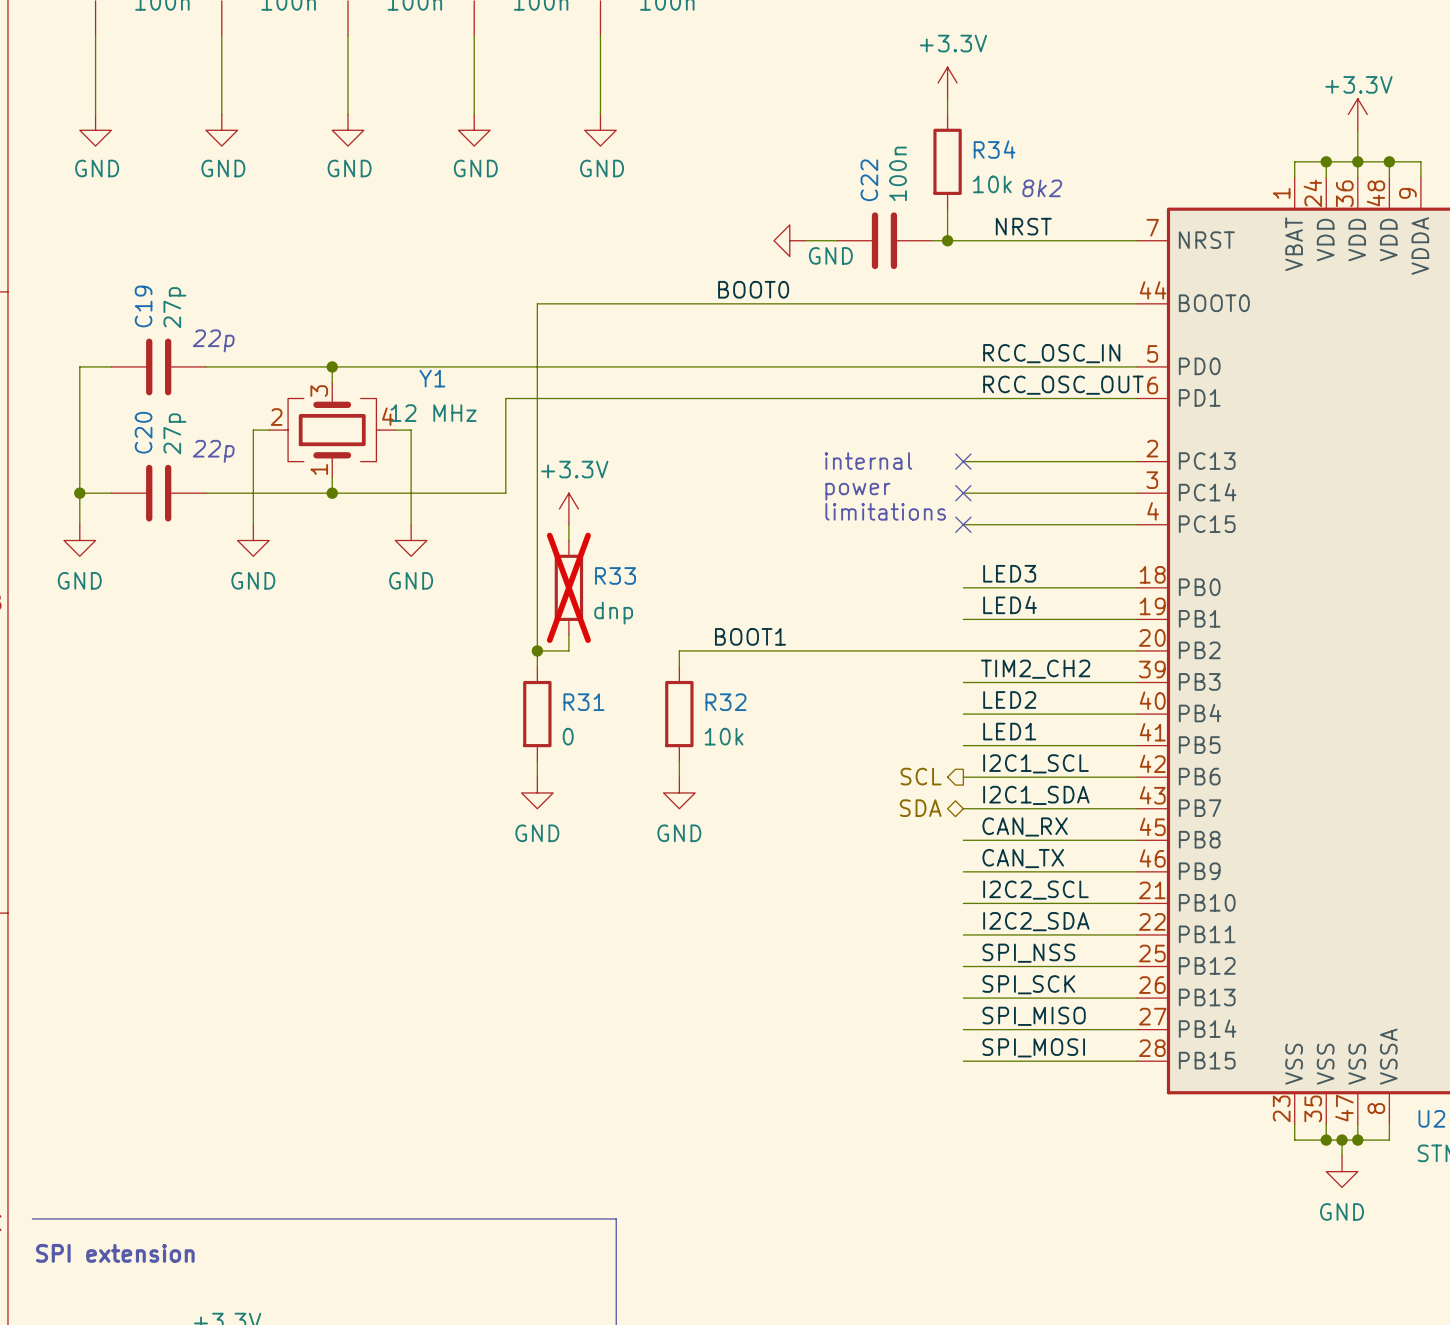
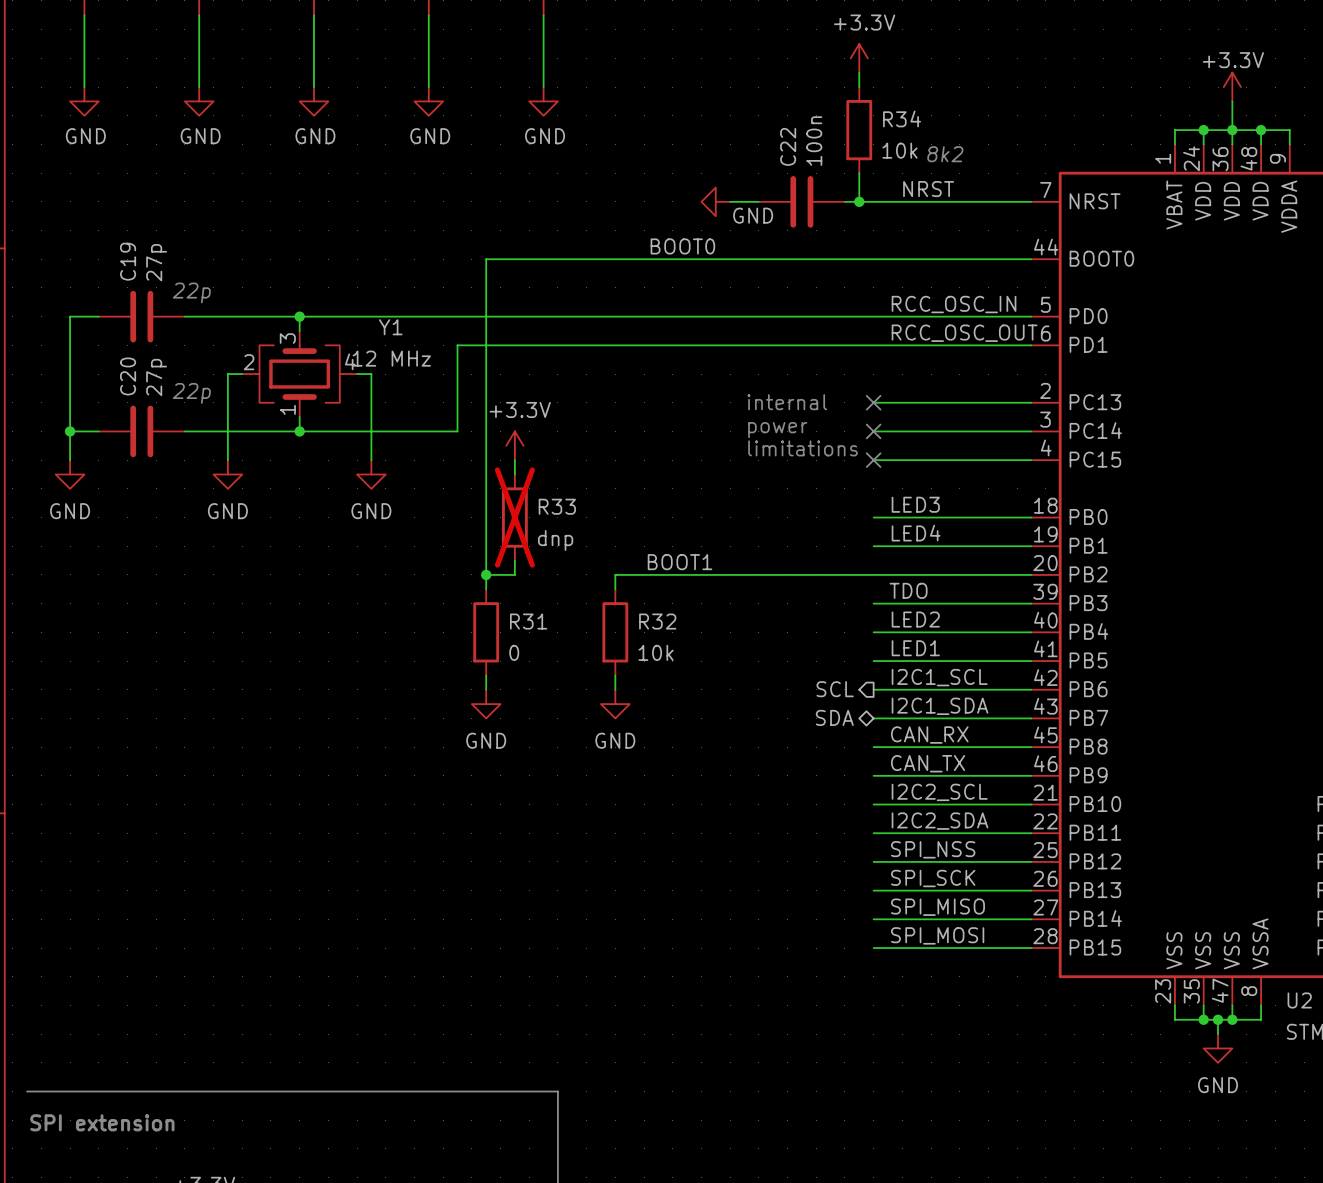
label: TIM2_CH2 (1035, 669) -> TDO (908, 590)

